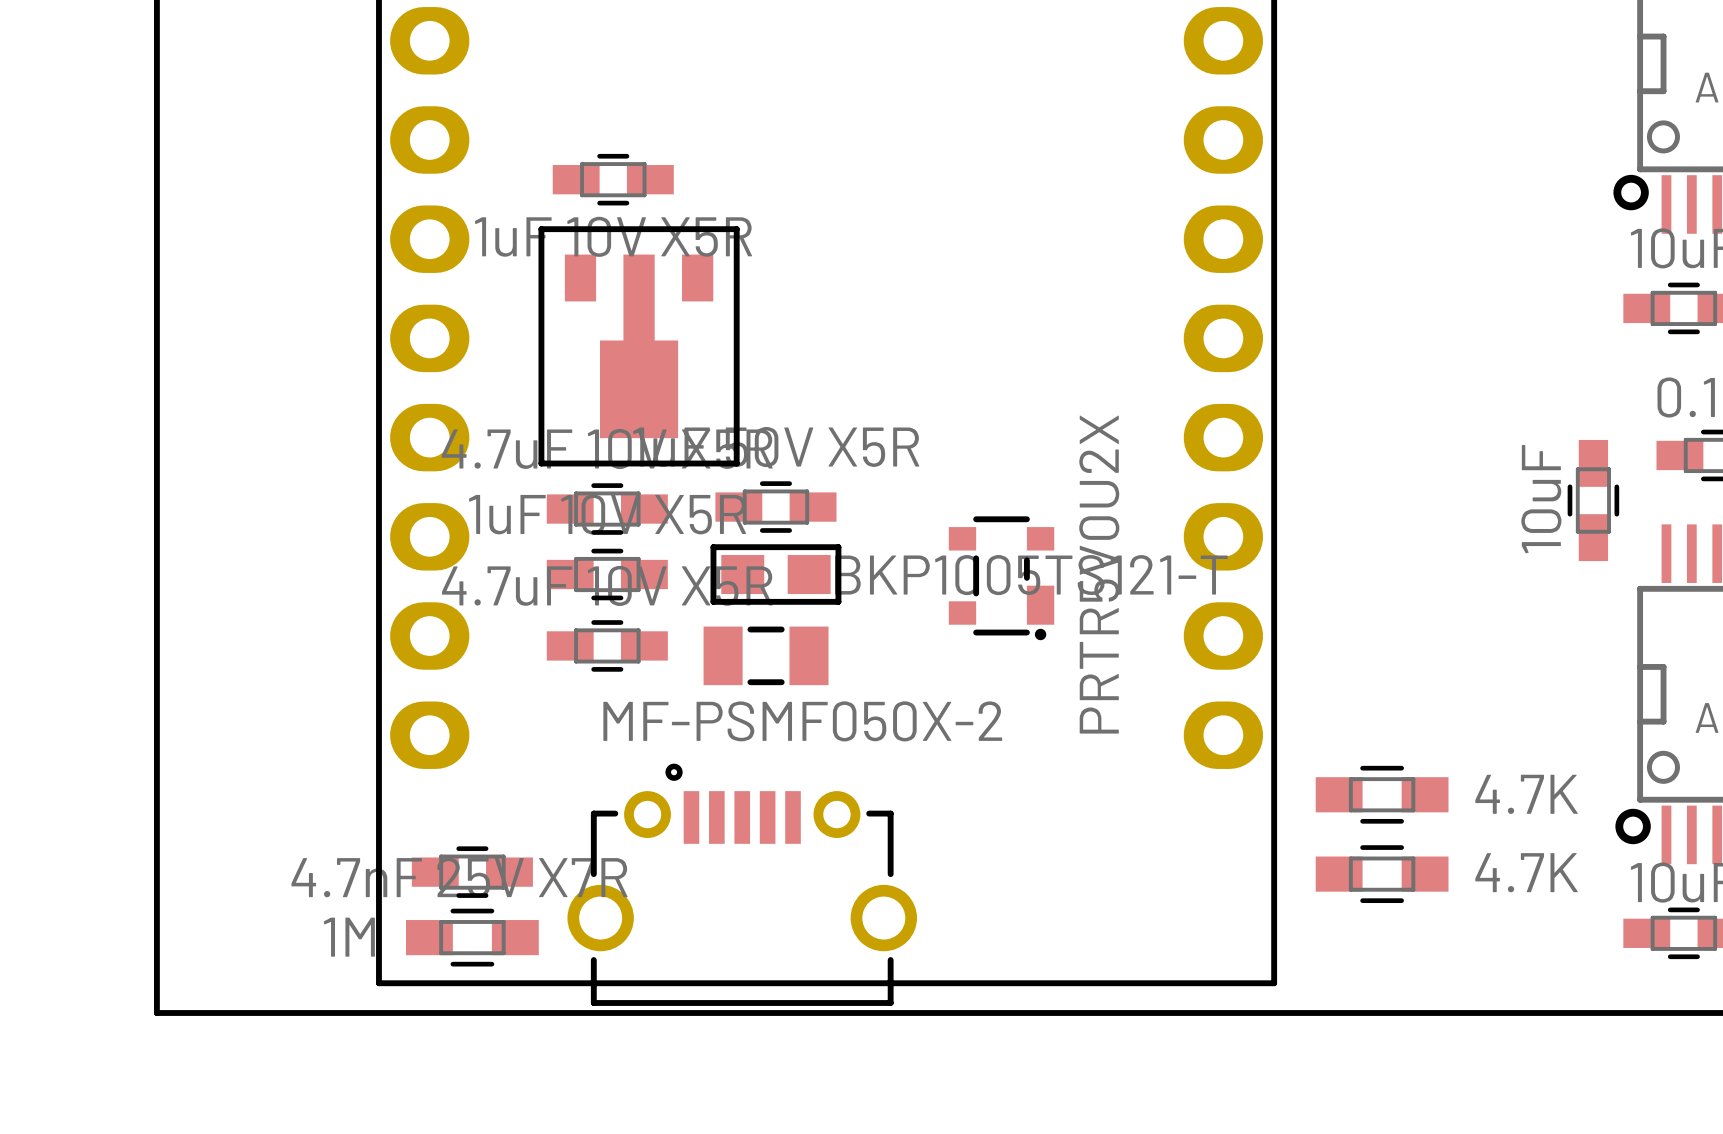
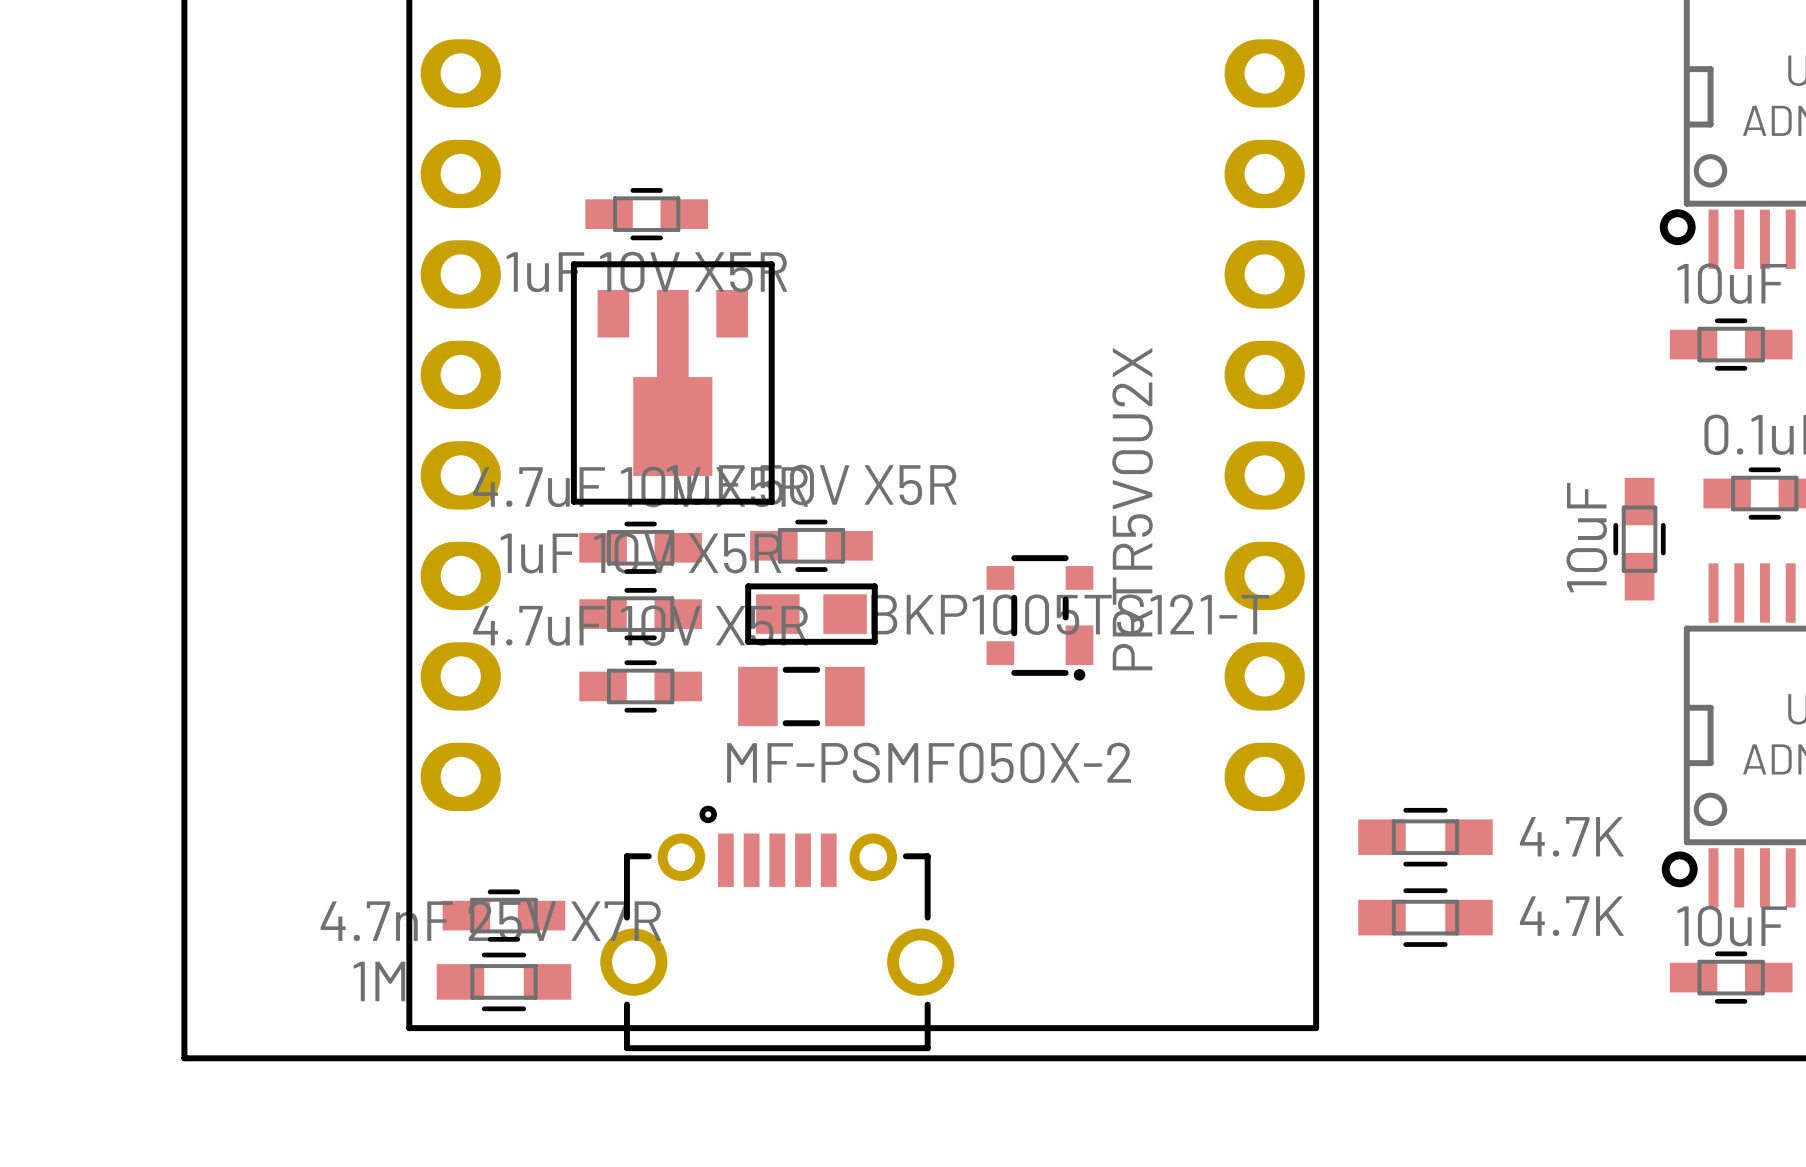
part value position: PRTR5V0U2X (1099, 574) -> PRTR5V0U2X (1132, 509)
part value position: MF-PSMF050X-2 (802, 721) -> MF-PSMF050X-2 (929, 762)

